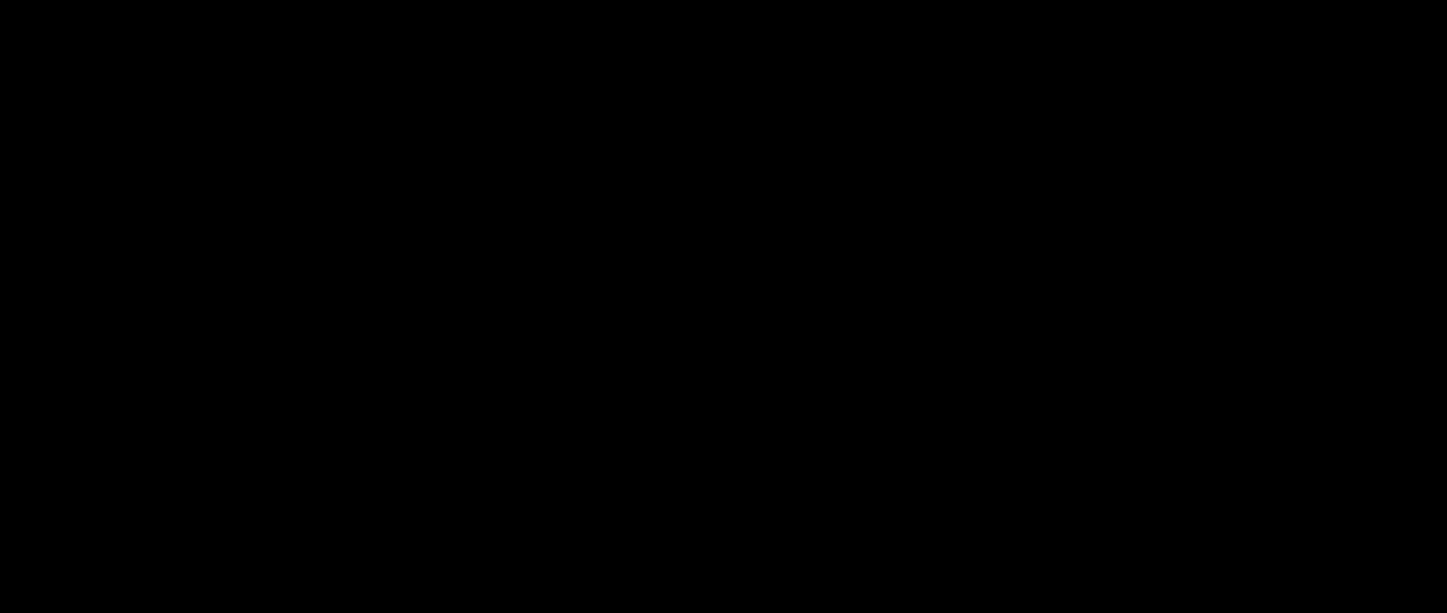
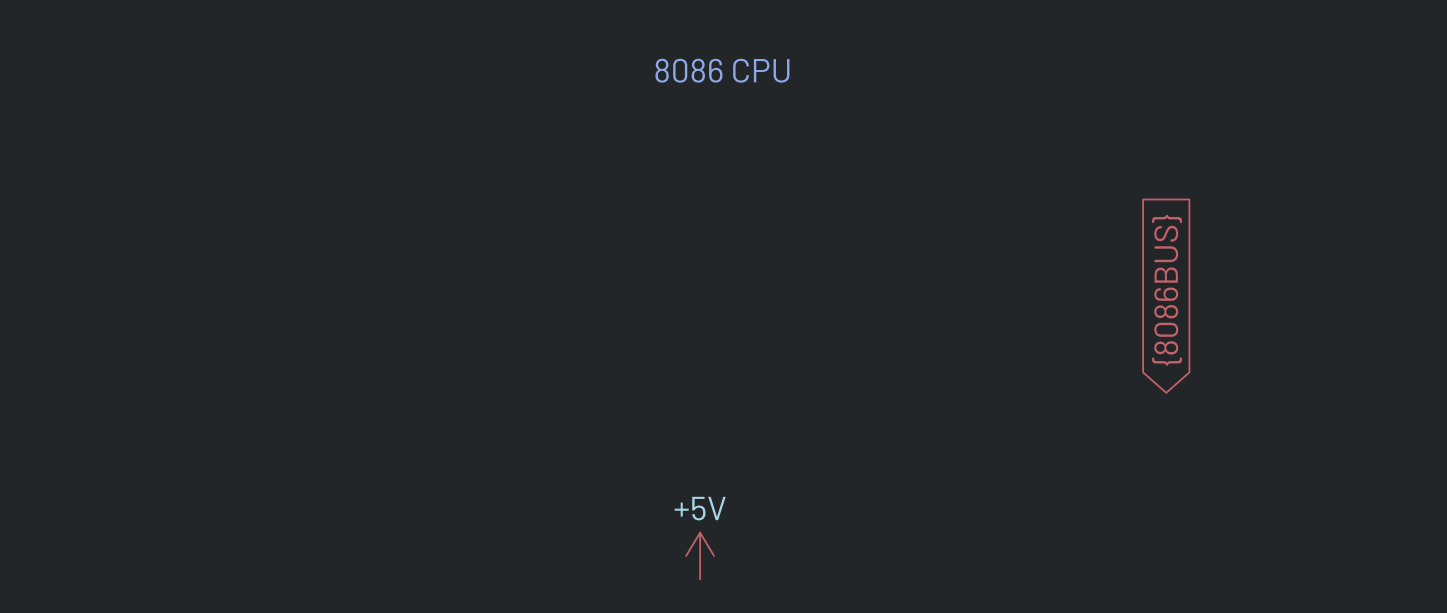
text: none -> 8086 CPU (722, 70)
global label: none -> {8086BUS} (1167, 290)
power symbol: none -> +5V (700, 555)

